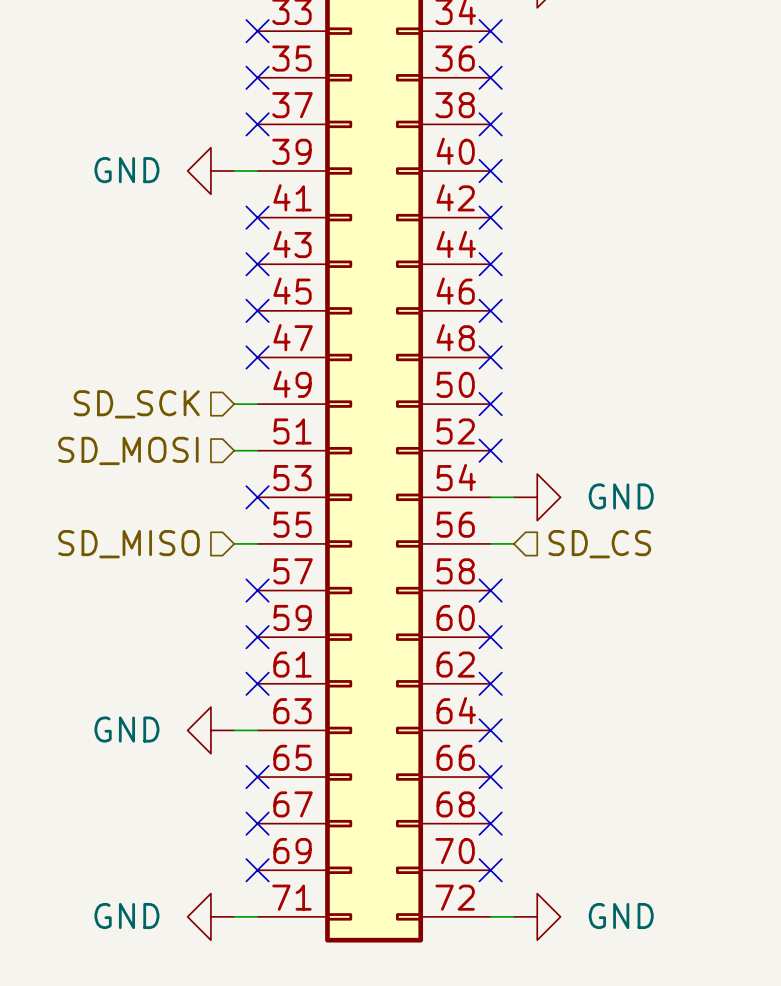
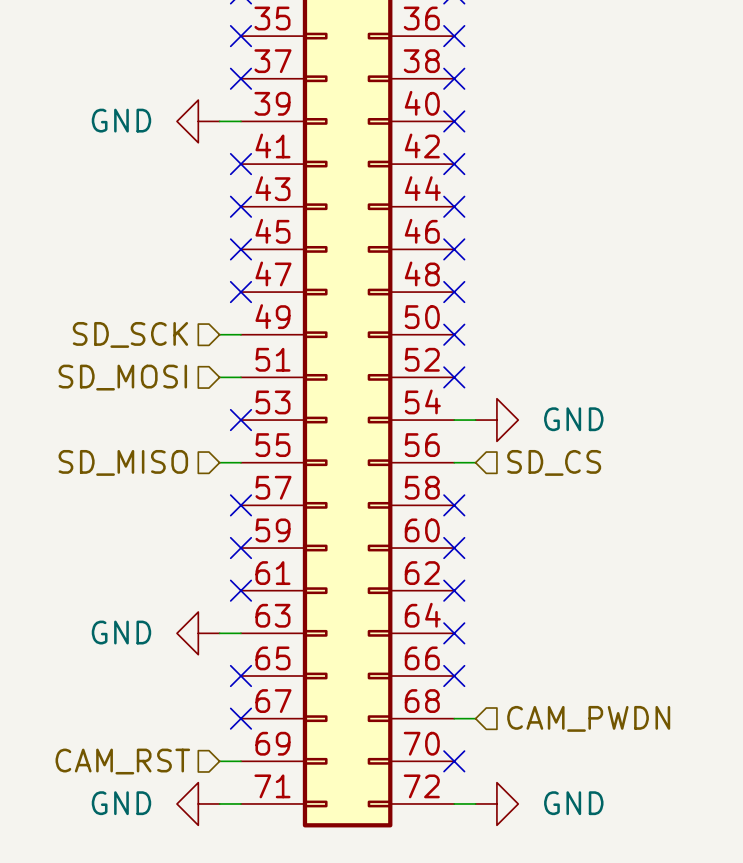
wire: none -> (454, 718) (475, 718)
no-connect mark: (490, 823) -> none
hierarchical label: none -> CAM_PWDN (588, 718)
hierarchical label: none -> CAM_RST (122, 761)
wire: none -> (219, 761) (240, 761)
no-connect mark: (257, 870) -> none

